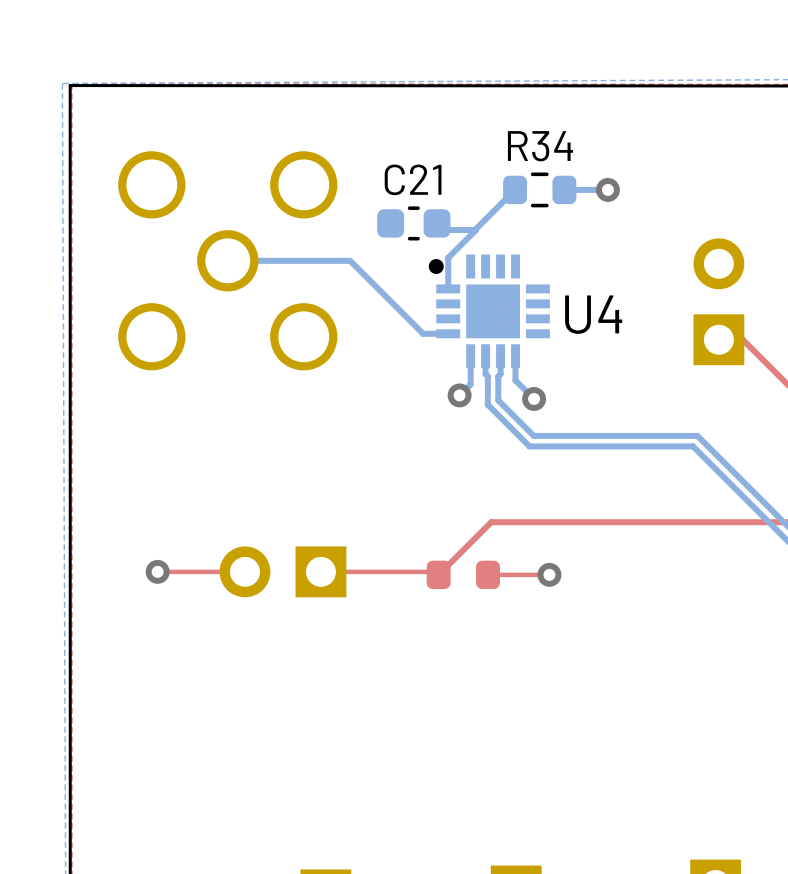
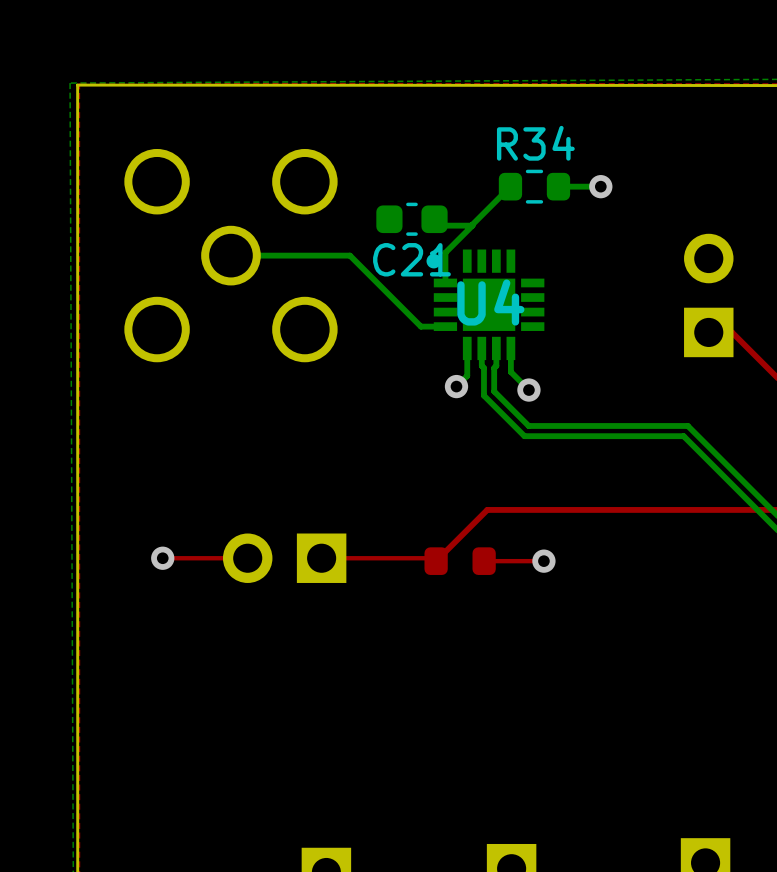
C21 name position: C21 (413, 179) -> C21 (411, 259)
U4 name position: U4 (593, 314) -> U4 (490, 302)

